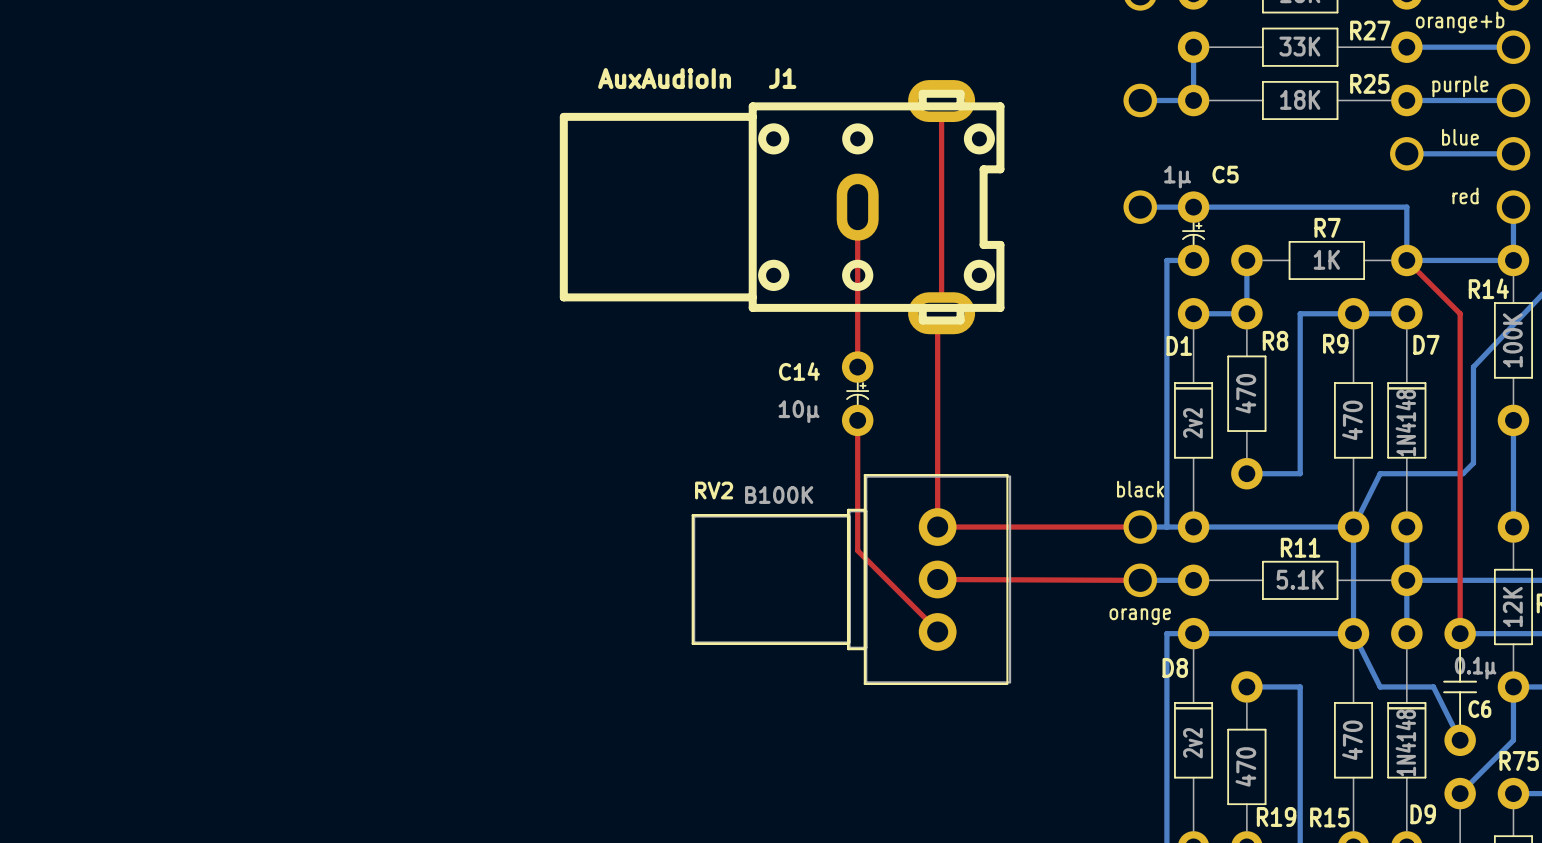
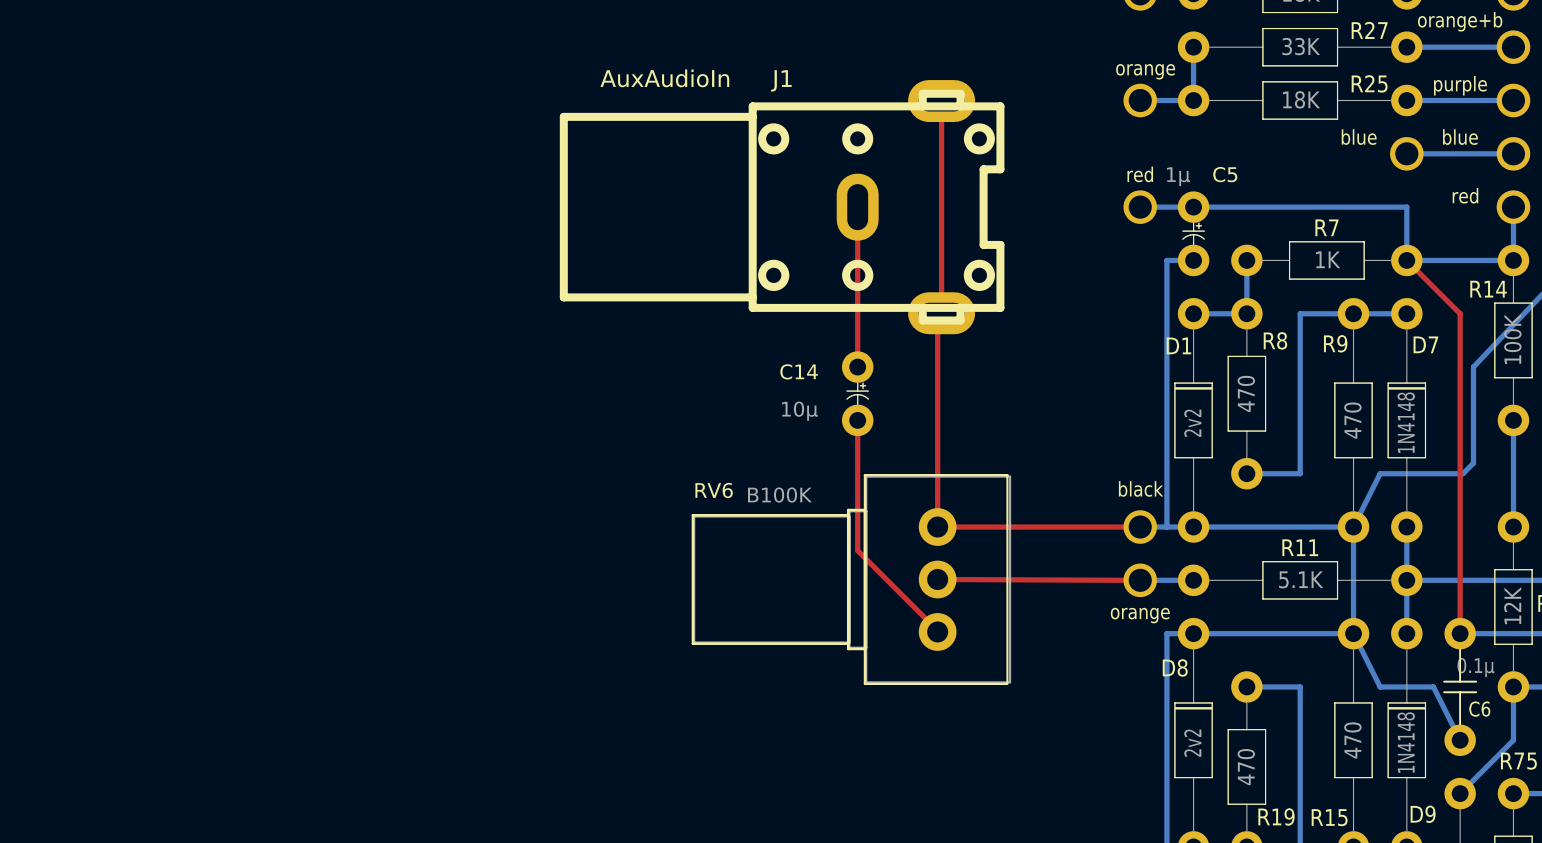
part value: none -> orange (1145, 71)
part value: none -> blue (1359, 137)
part value: none -> red (1140, 174)
RV2 name: RV2 (714, 490) -> RV6 (714, 490)

